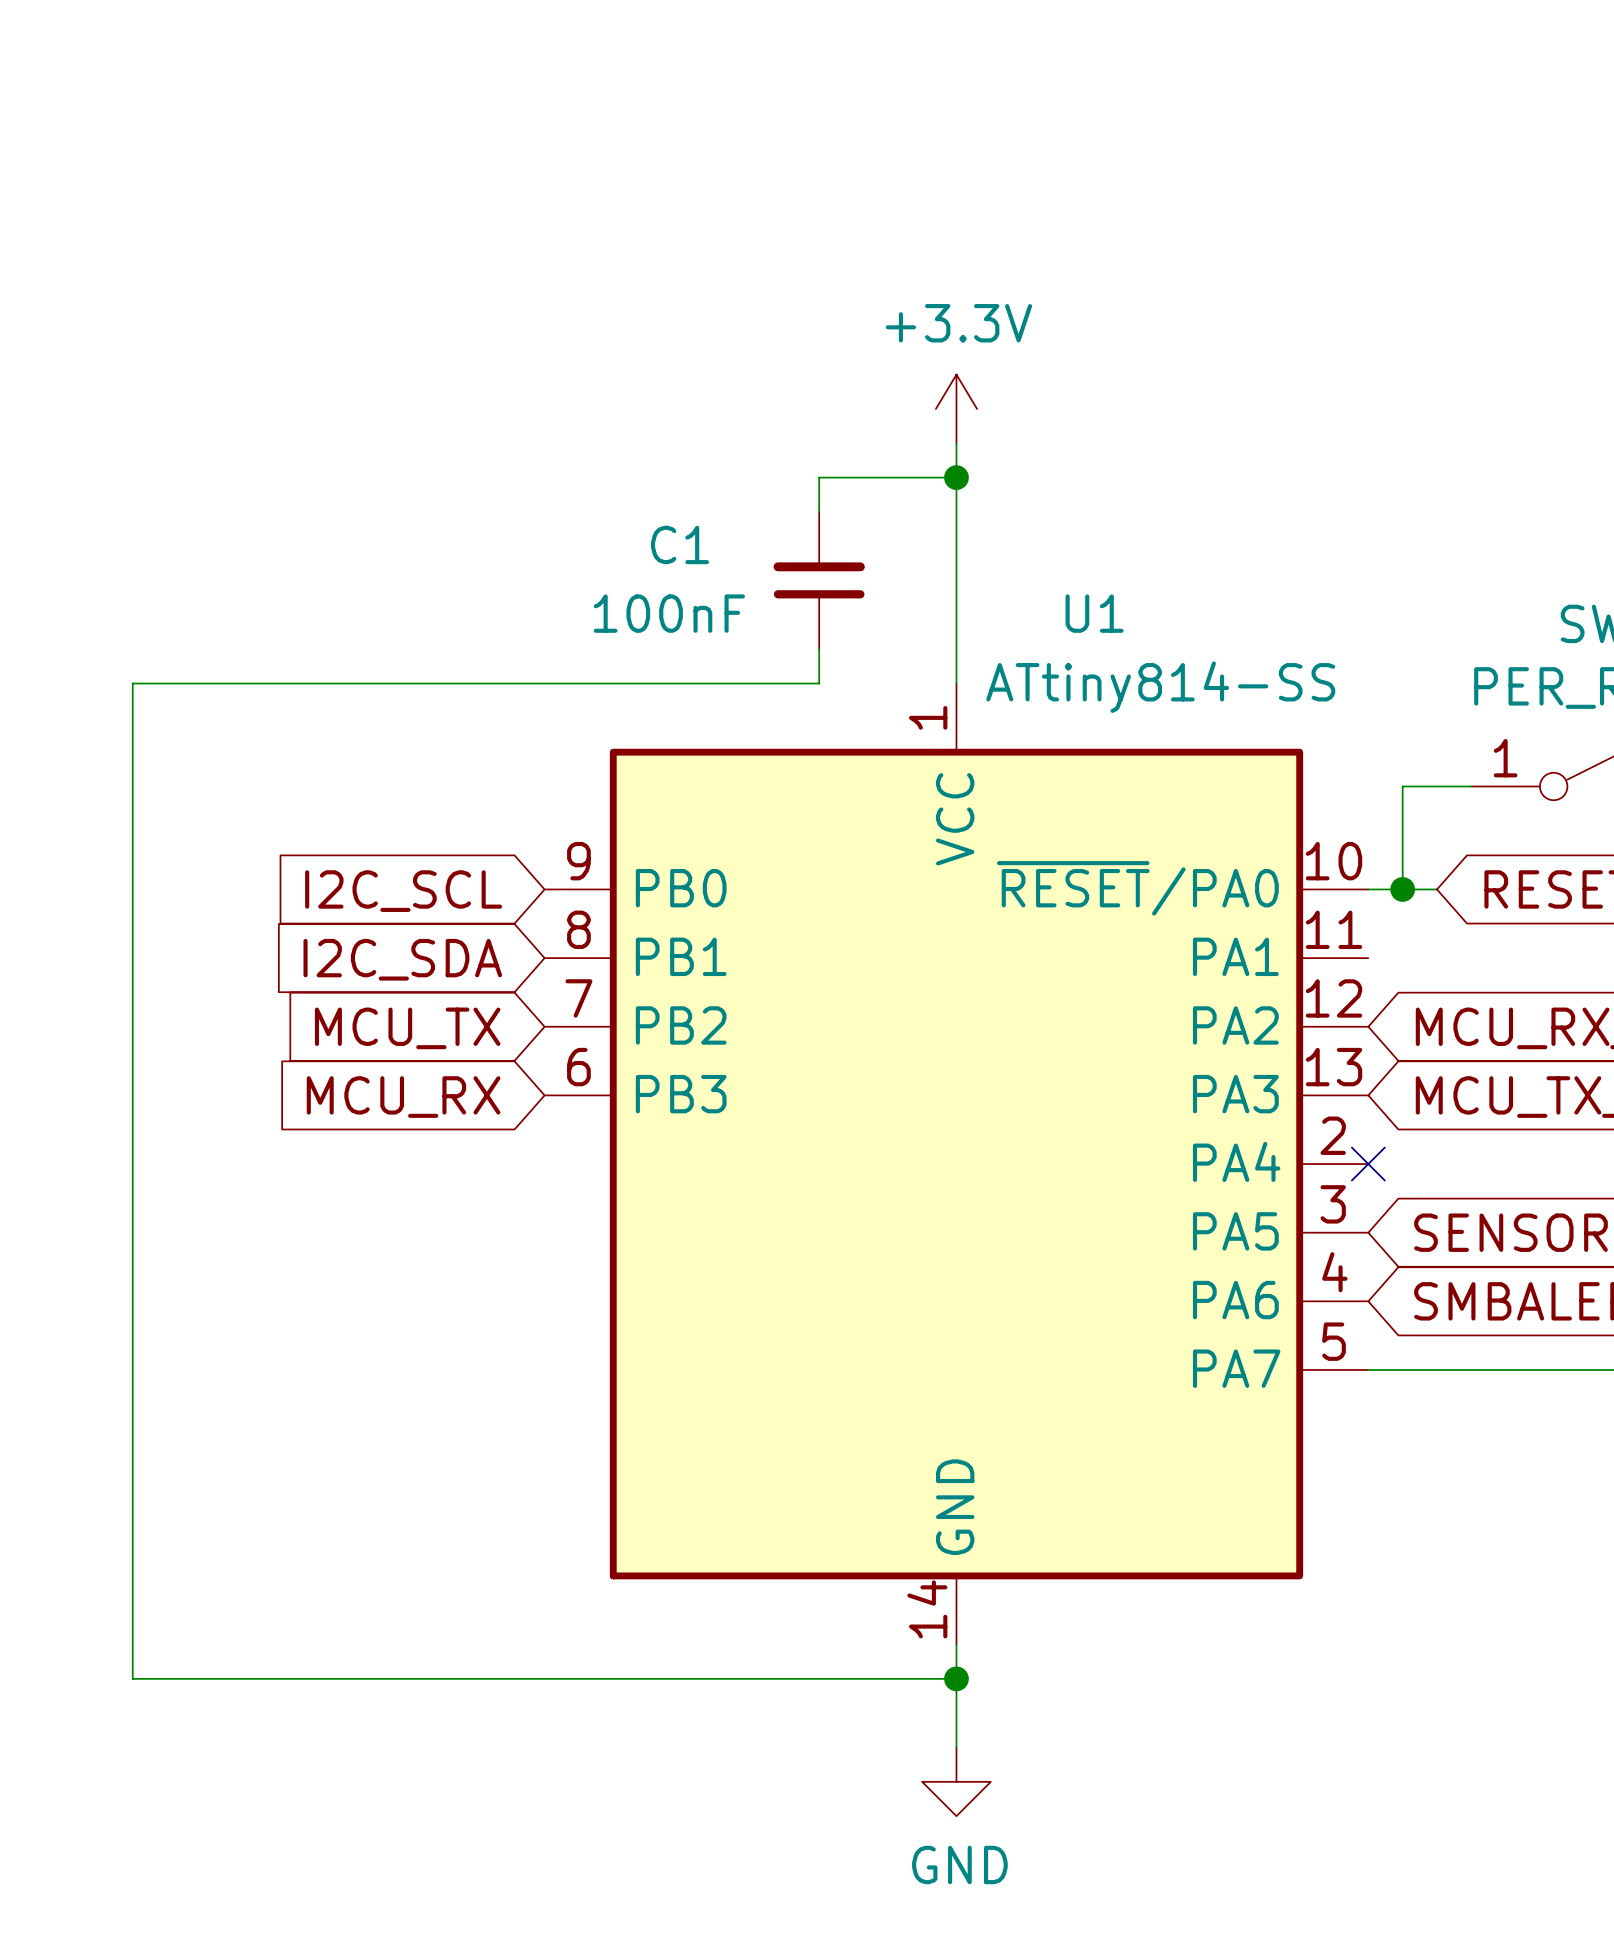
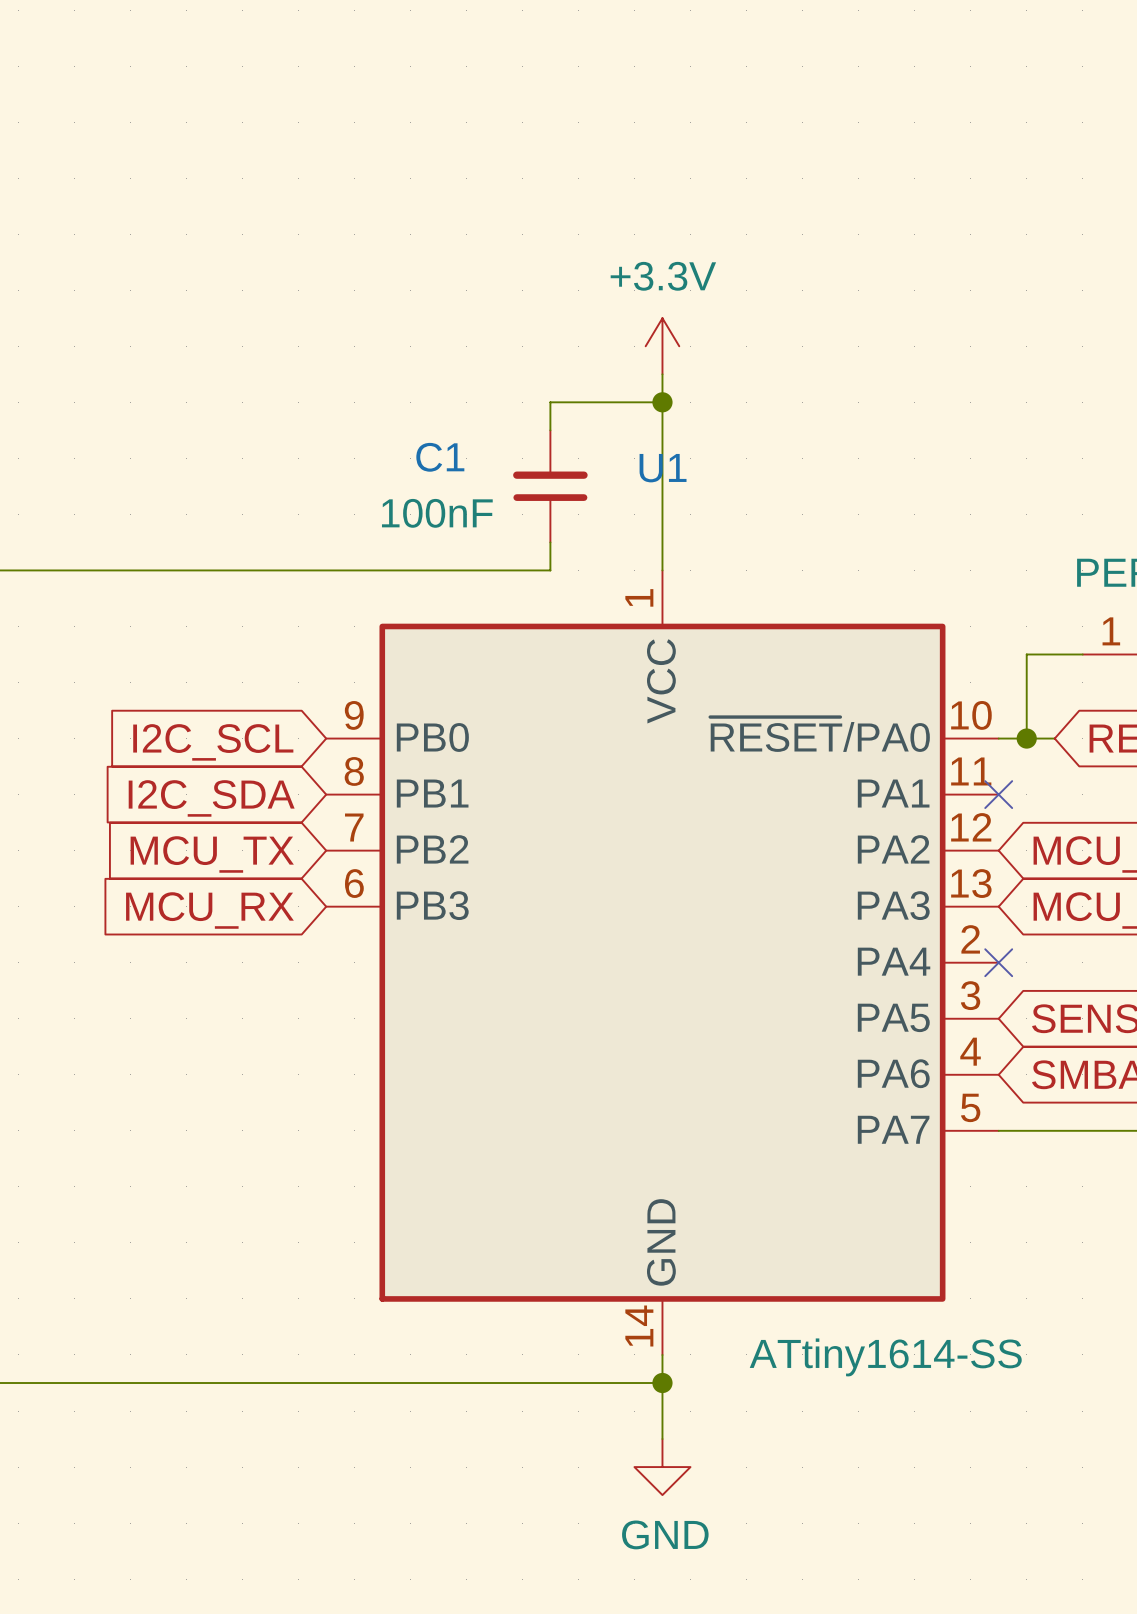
U1 name position: U1 (1094, 613) -> U1 (663, 468)
U1 value: ATtiny814-SS (1160, 687) -> ATtiny1614-SS (885, 1357)
no-connect mark: none -> (998, 794)

